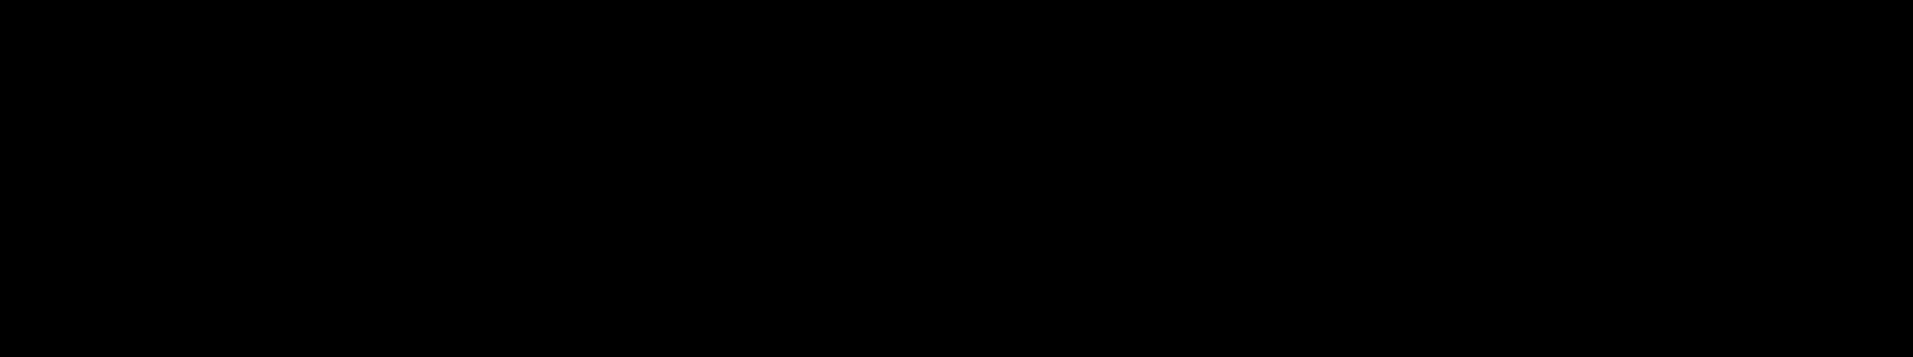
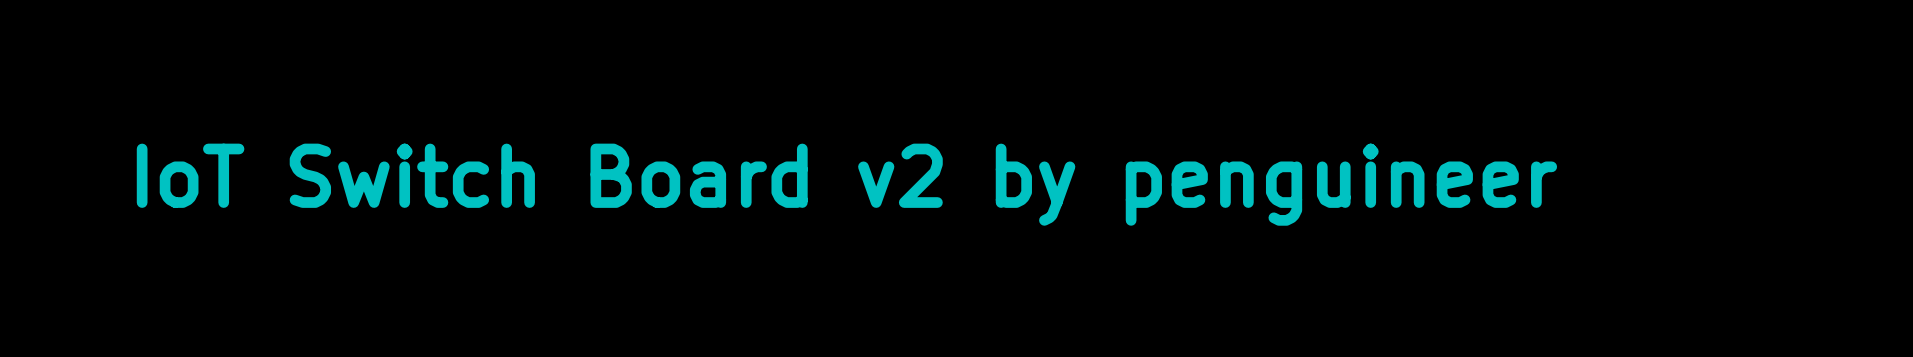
text: none -> IoT Switch Board v2 by penguineer (846, 184)

